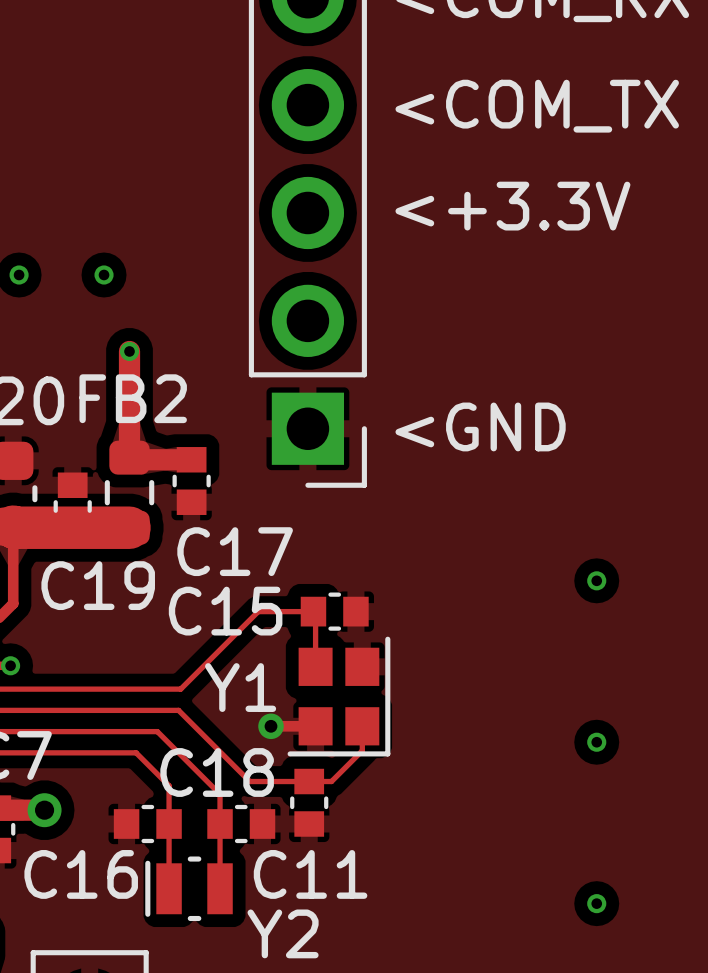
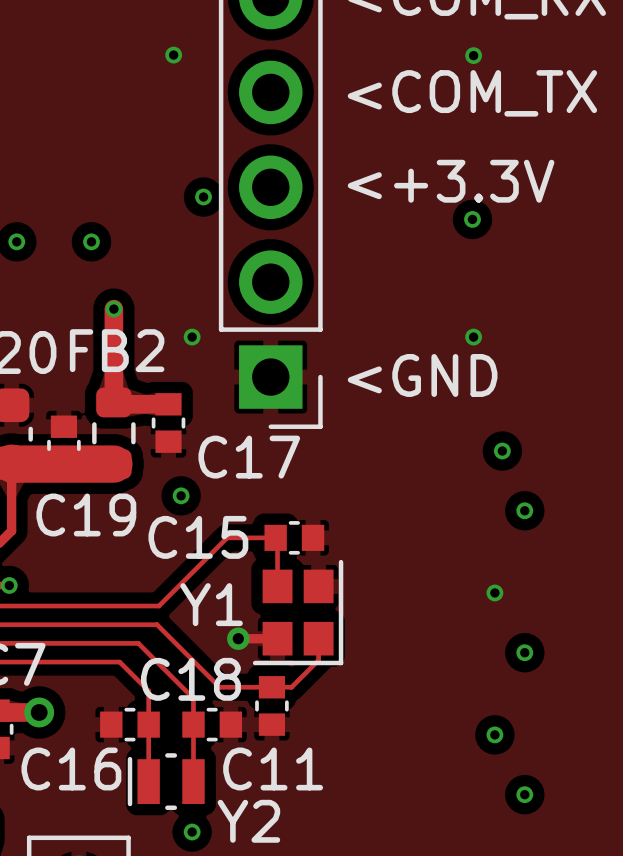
via: none -> (173, 55)
via: none -> (473, 55)
via: none -> (203, 197)
via: none -> (472, 219)
via: none -> (192, 337)
via: none -> (473, 337)
via: none -> (502, 451)
C17 name position: C17 (235, 551) -> C17 (249, 457)
via: none -> (181, 495)
via: none -> (494, 592)
via: none -> (494, 734)
via: none -> (192, 832)

